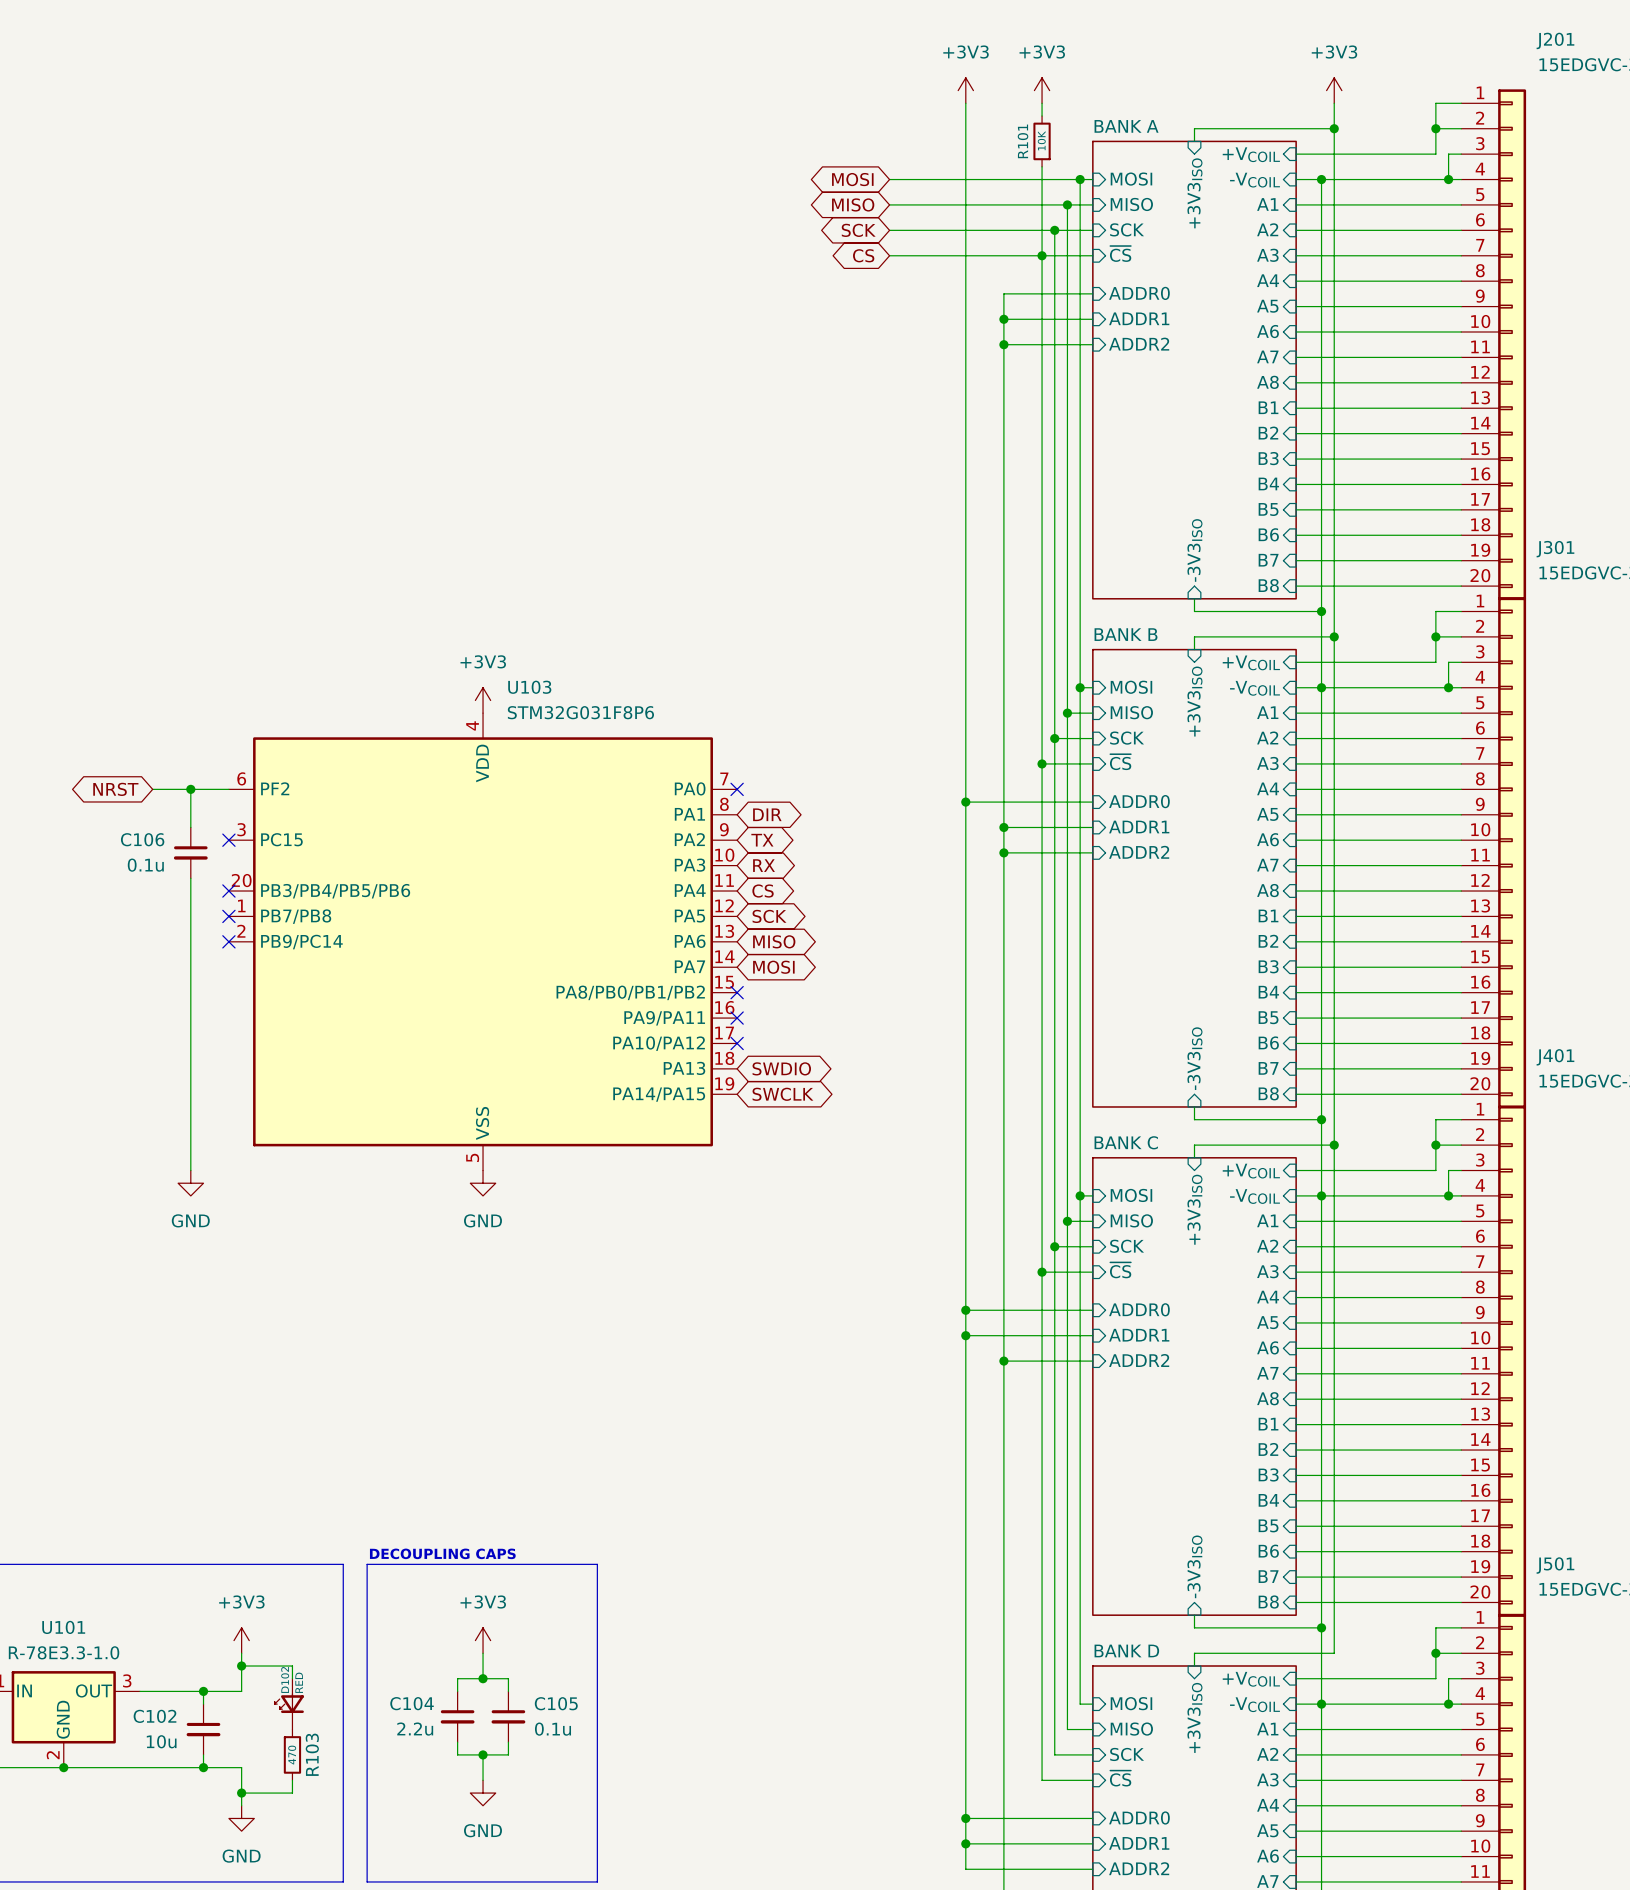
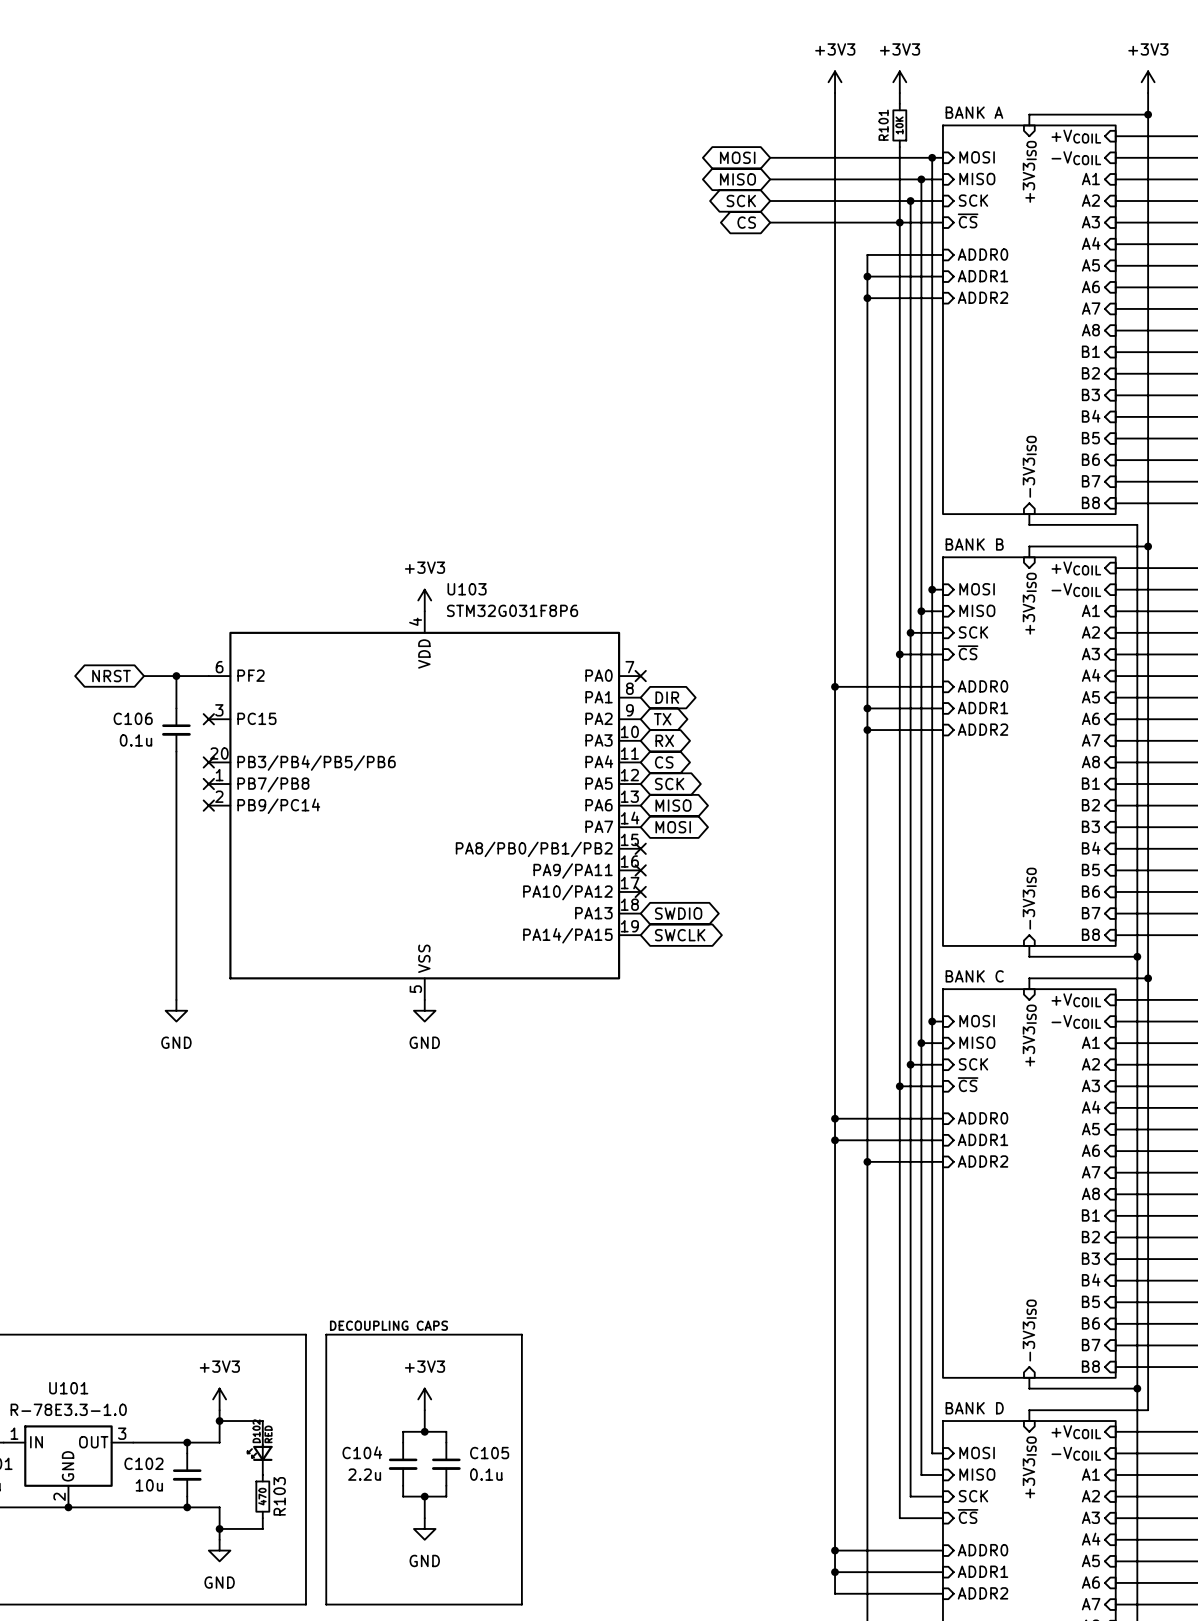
wire: (1321, 179) (1321, 611) -> none
junction: (1321, 179) -> none
junction: (1321, 611) -> none
junction: (1321, 687) -> none
junction: (1321, 1195) -> none
junction: (1321, 1704) -> none

